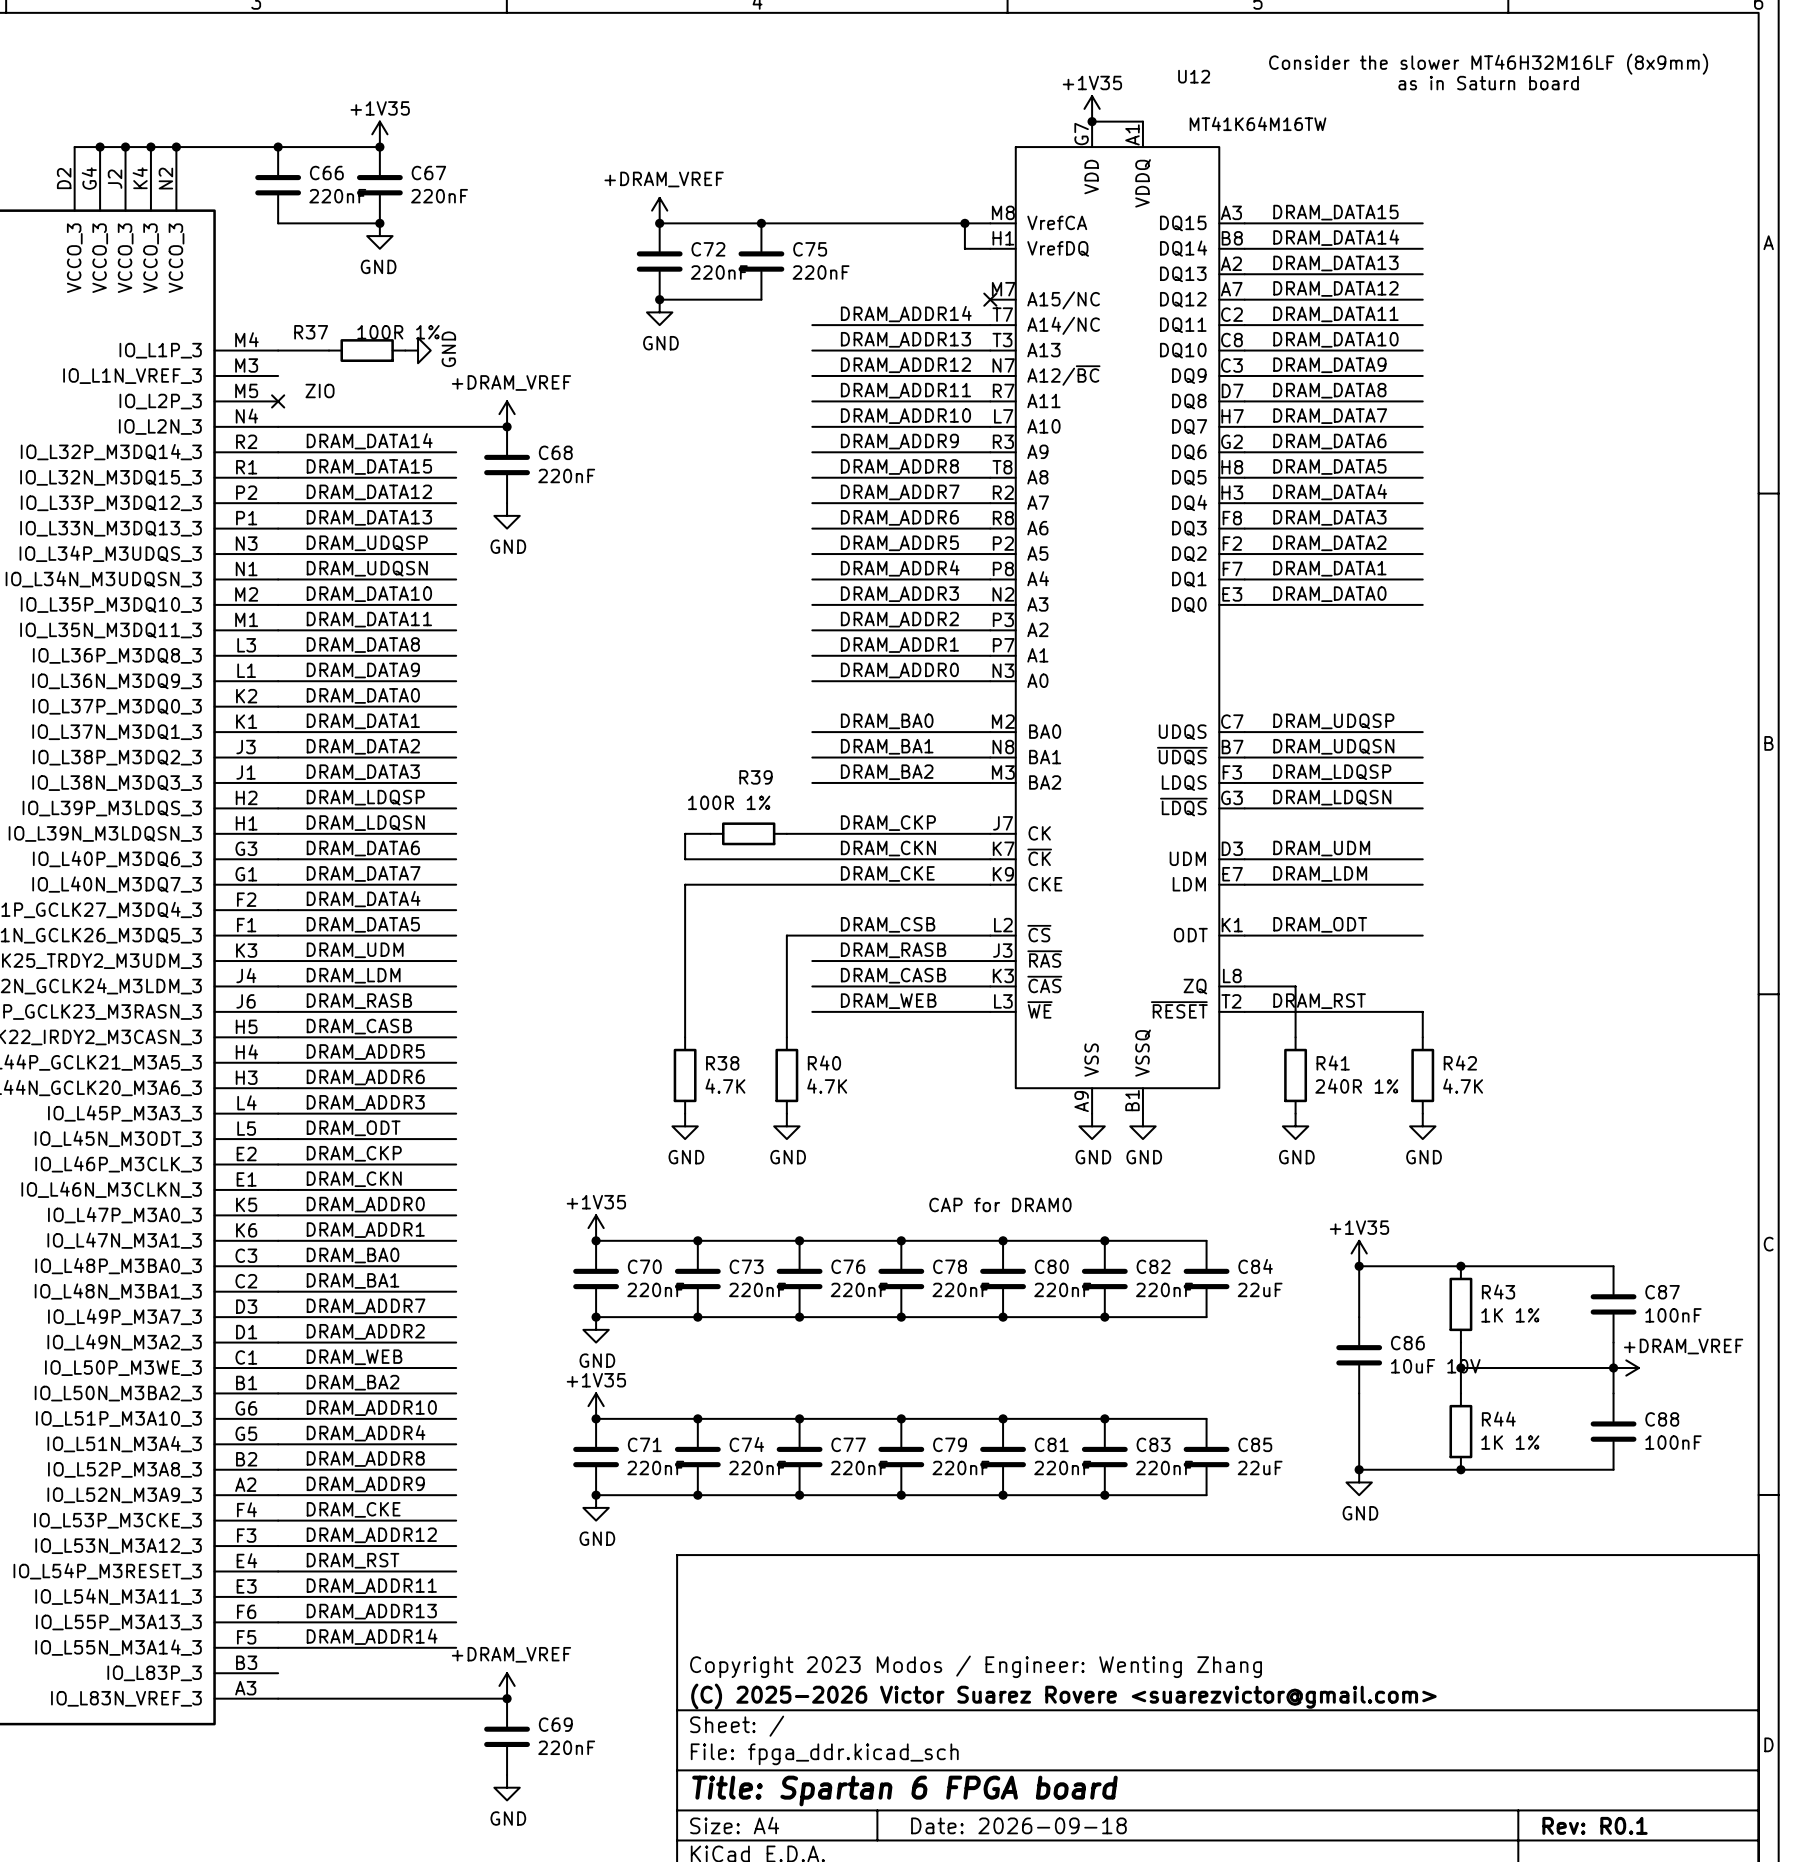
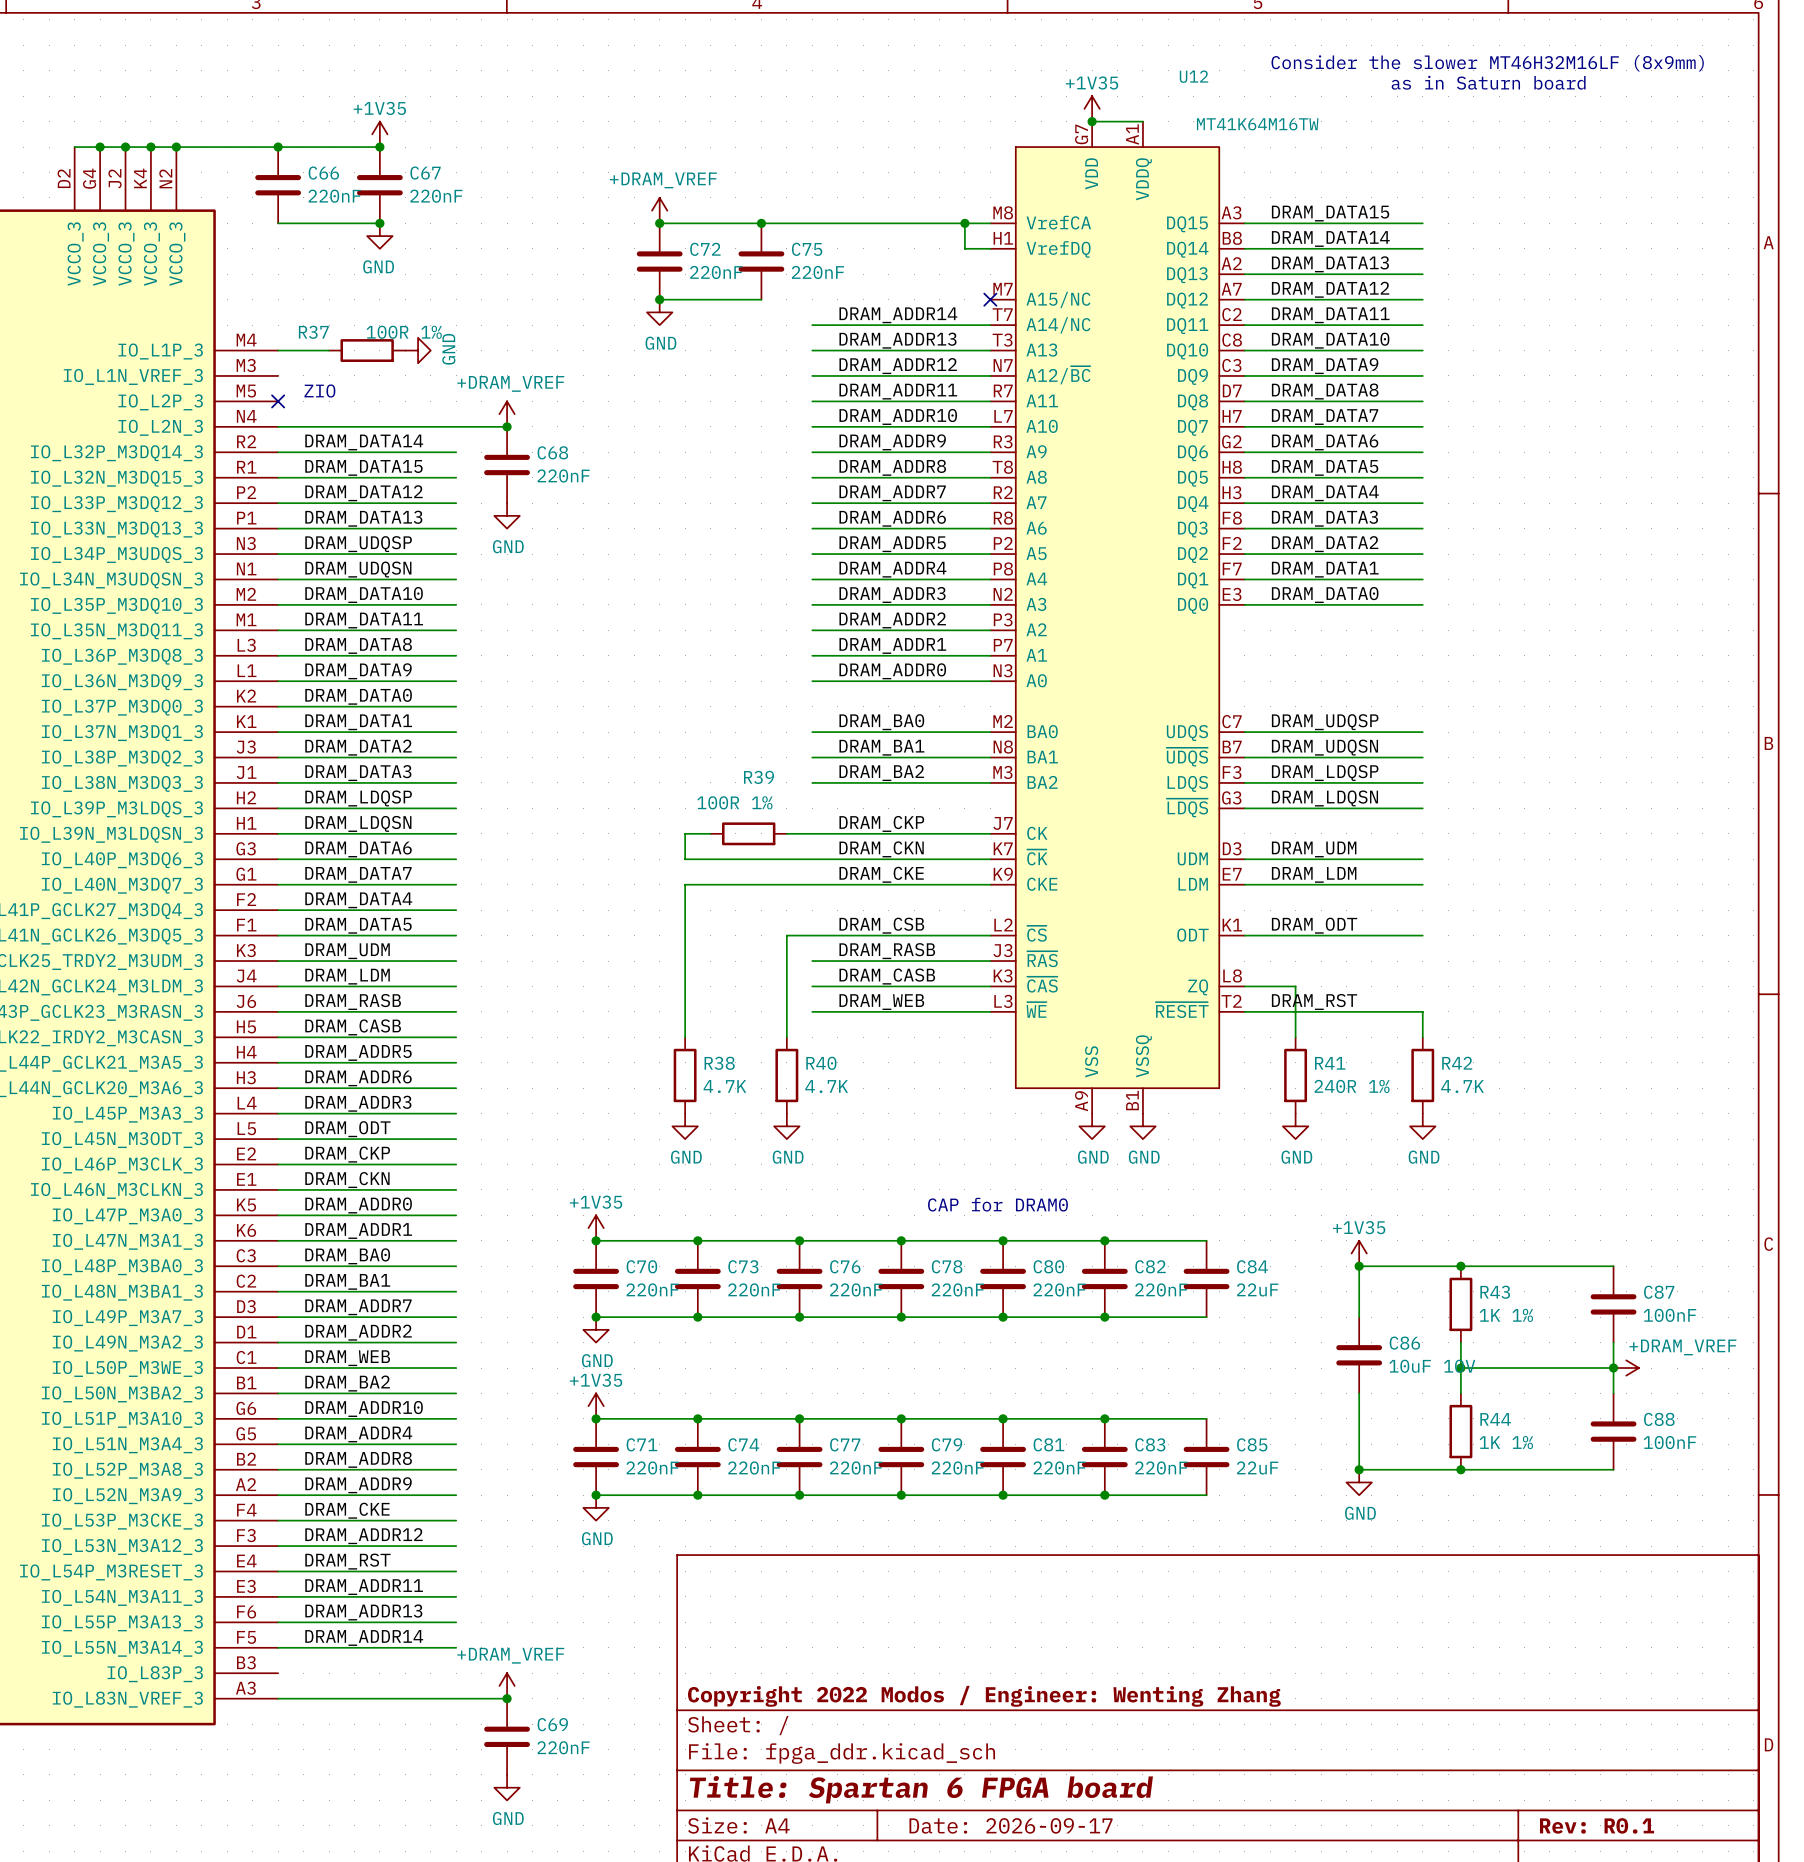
title block: Copyright 2023 Modos / Engineer: Wenting Zhang (976, 1666) -> none
title block: (C) 2025-2026 Victor Suarez Rovere <suarezvictor@gmail.com> (1063, 1696) -> Copyright 2022 Modos / Engineer: Wenting Zhang (984, 1696)
title block: Date: 2026-09-18 (1018, 1825) -> Date: 2026-09-17 (1011, 1825)

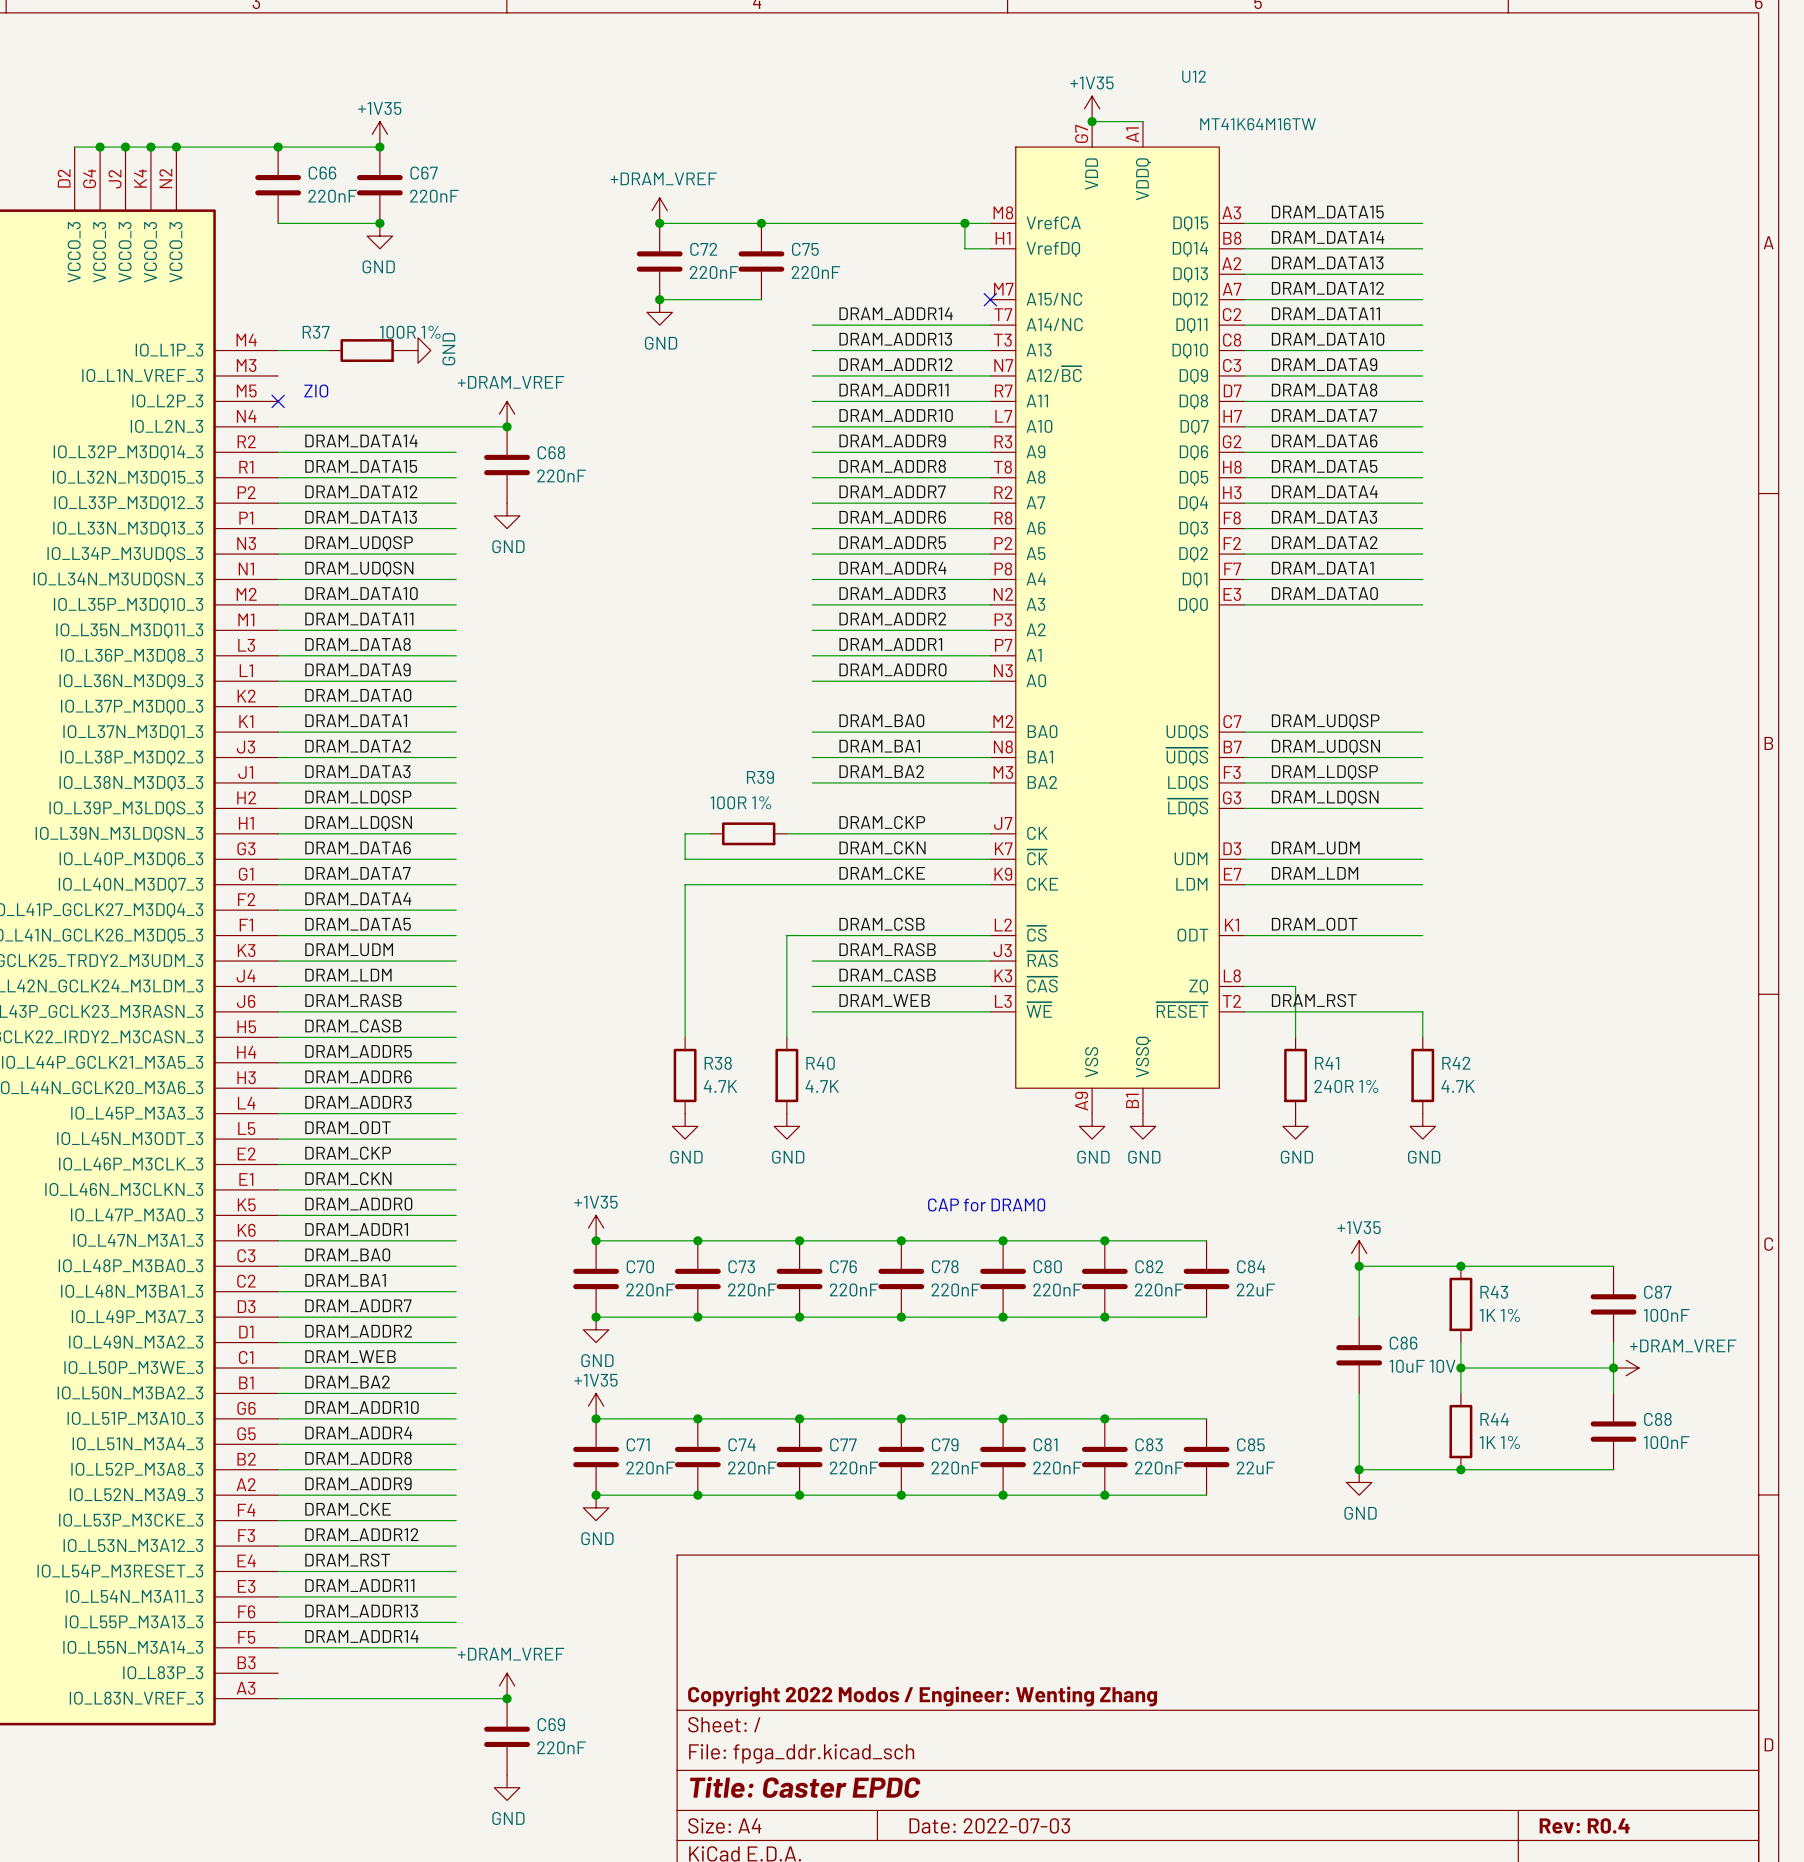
text: Consider the slower MT46H32M16LF (8x9mm) (1487, 63) -> none
text: as in Saturn board (1488, 82) -> none
title block: Title: Spartan 6 FPGA board (921, 1789) -> Title: Caster EPDC (805, 1787)
title block: Date: 2026-09-17 (1011, 1825) -> Date: 2022-07-03 (989, 1825)
title block: Rev: R0.1 (1597, 1825) -> Rev: R0.4 (1584, 1825)

